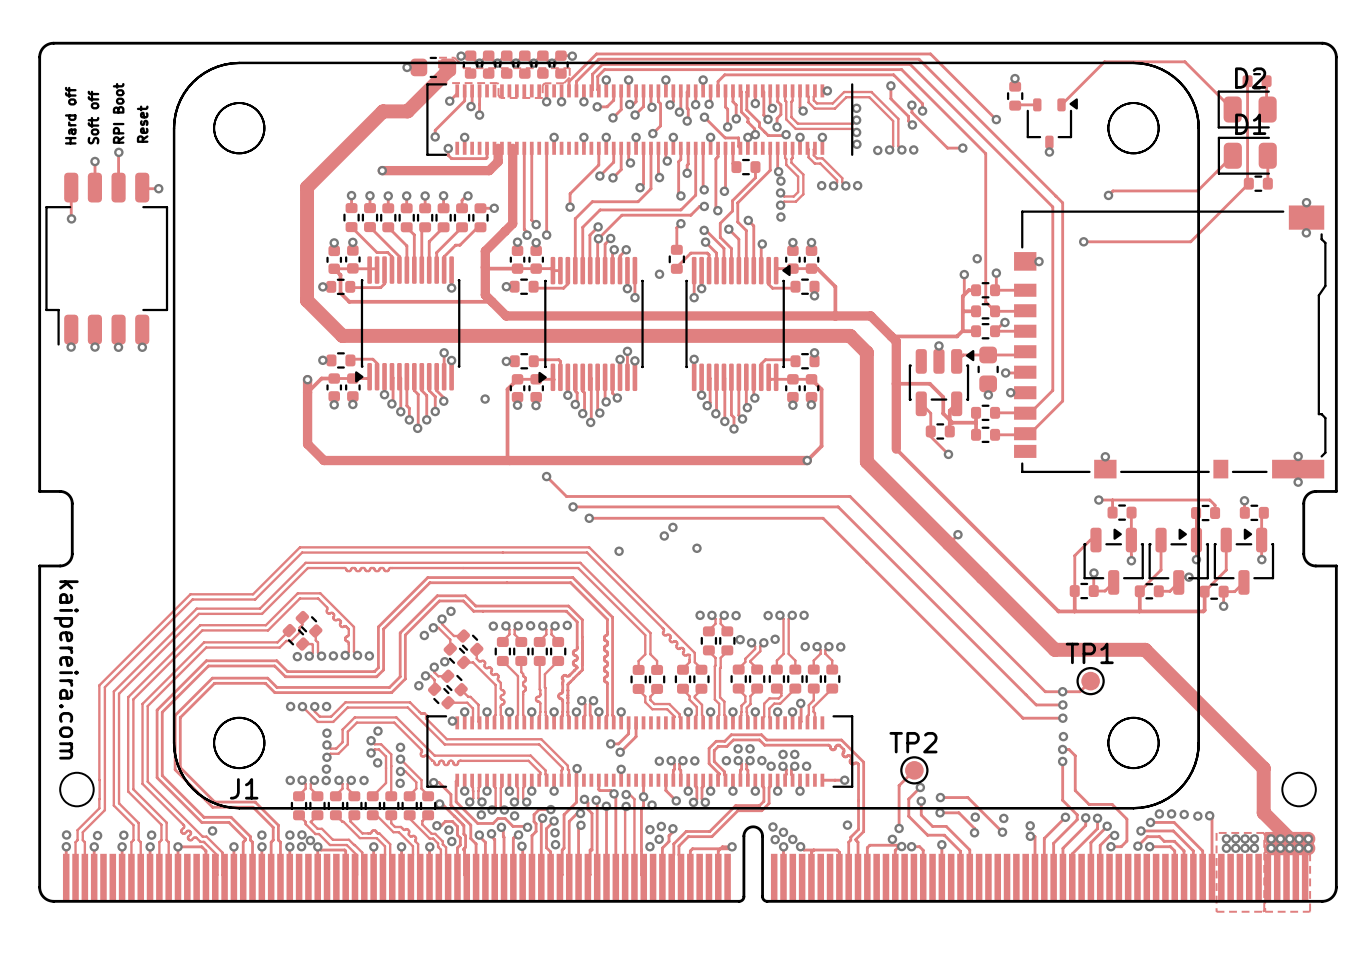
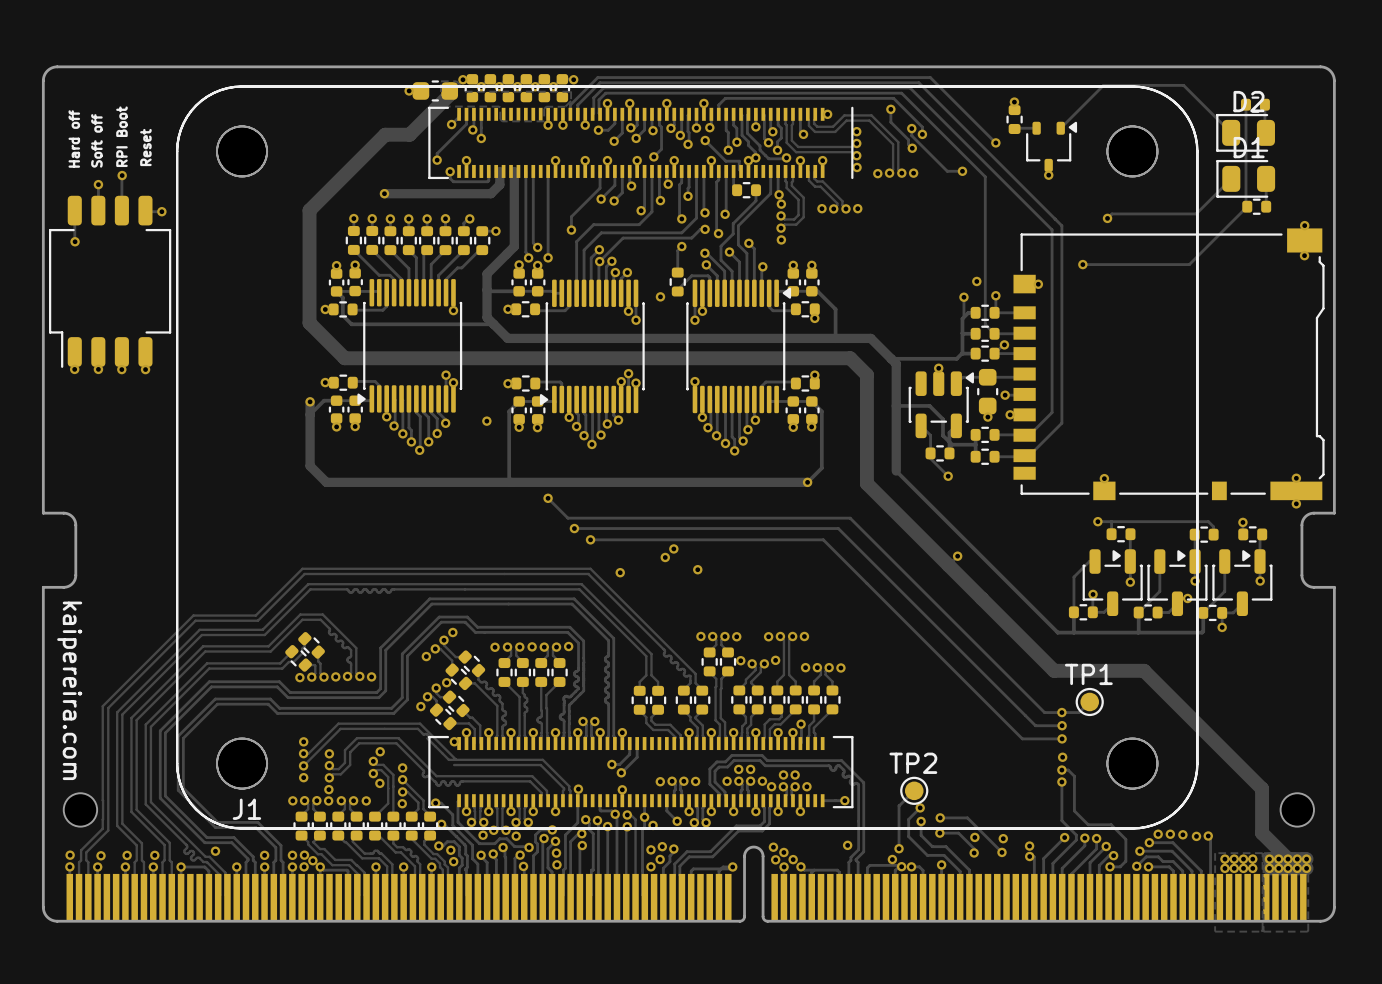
via: (290, 706) -> none
track: (302, 706) (317, 721) (333, 721) (347, 707) (407, 707) (444, 744) (452, 744) -> none
via: (302, 706) -> none
track: (314, 706) (314, 711) (319, 716) (331, 716) (345, 702) (410, 702) (415, 708) -> (303, 765) (340, 728) (417, 728)
via: (314, 706) -> none
via: (326, 706) -> none
via: none -> (303, 741)
track: none -> (303, 753) (308, 753) (338, 723) (420, 723) (456, 759)
via: none -> (303, 753)
via: none -> (303, 765)
via: none -> (303, 777)

